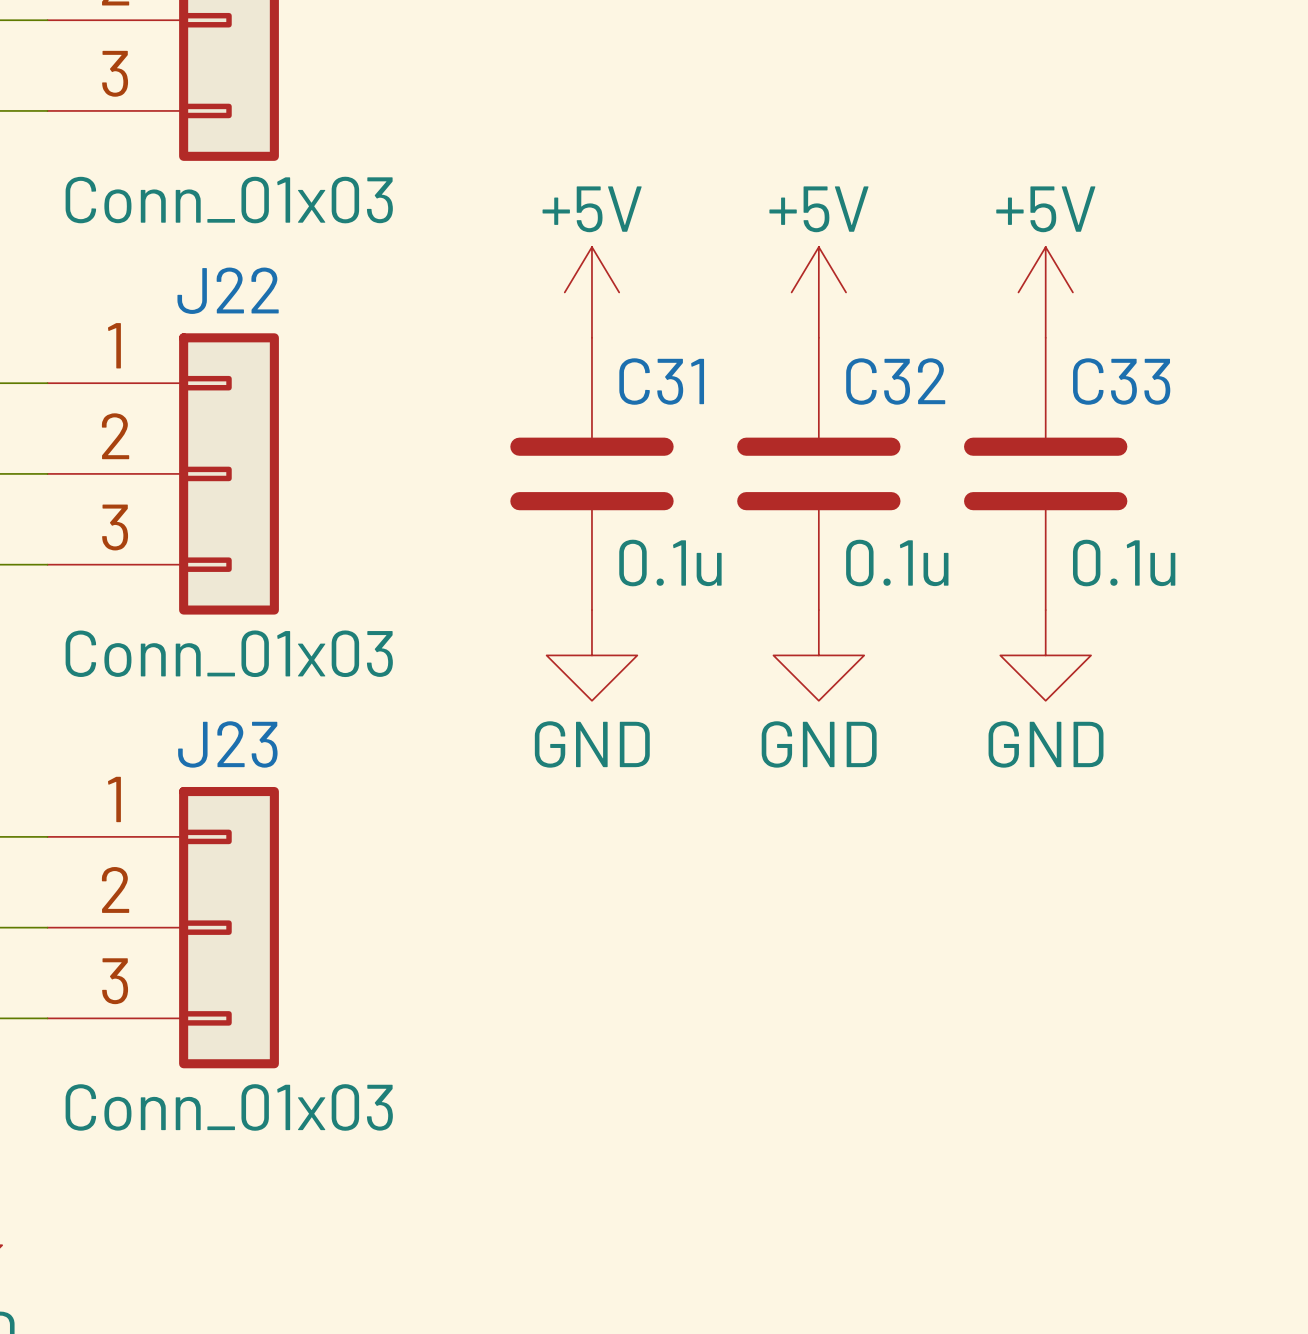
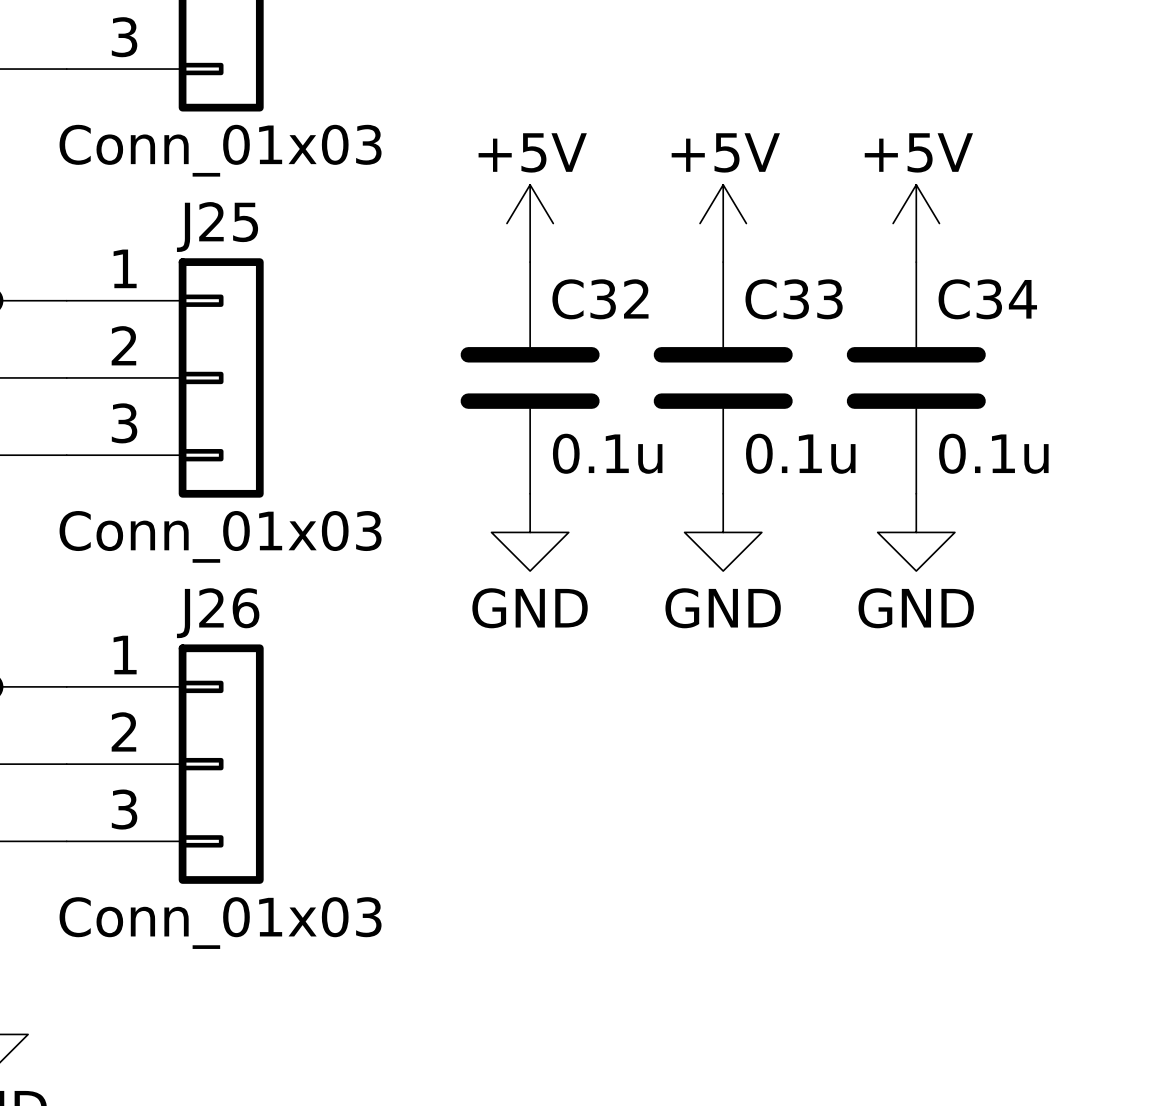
J22 name: J22 (228, 290) -> J25 (217, 227)
C31 name: C31 (661, 381) -> C32 (600, 299)
C32 name: C32 (895, 381) -> C33 (794, 299)
C33 name: C33 (1121, 381) -> C34 (987, 299)
J23 name: J23 (227, 744) -> J26 (218, 613)

